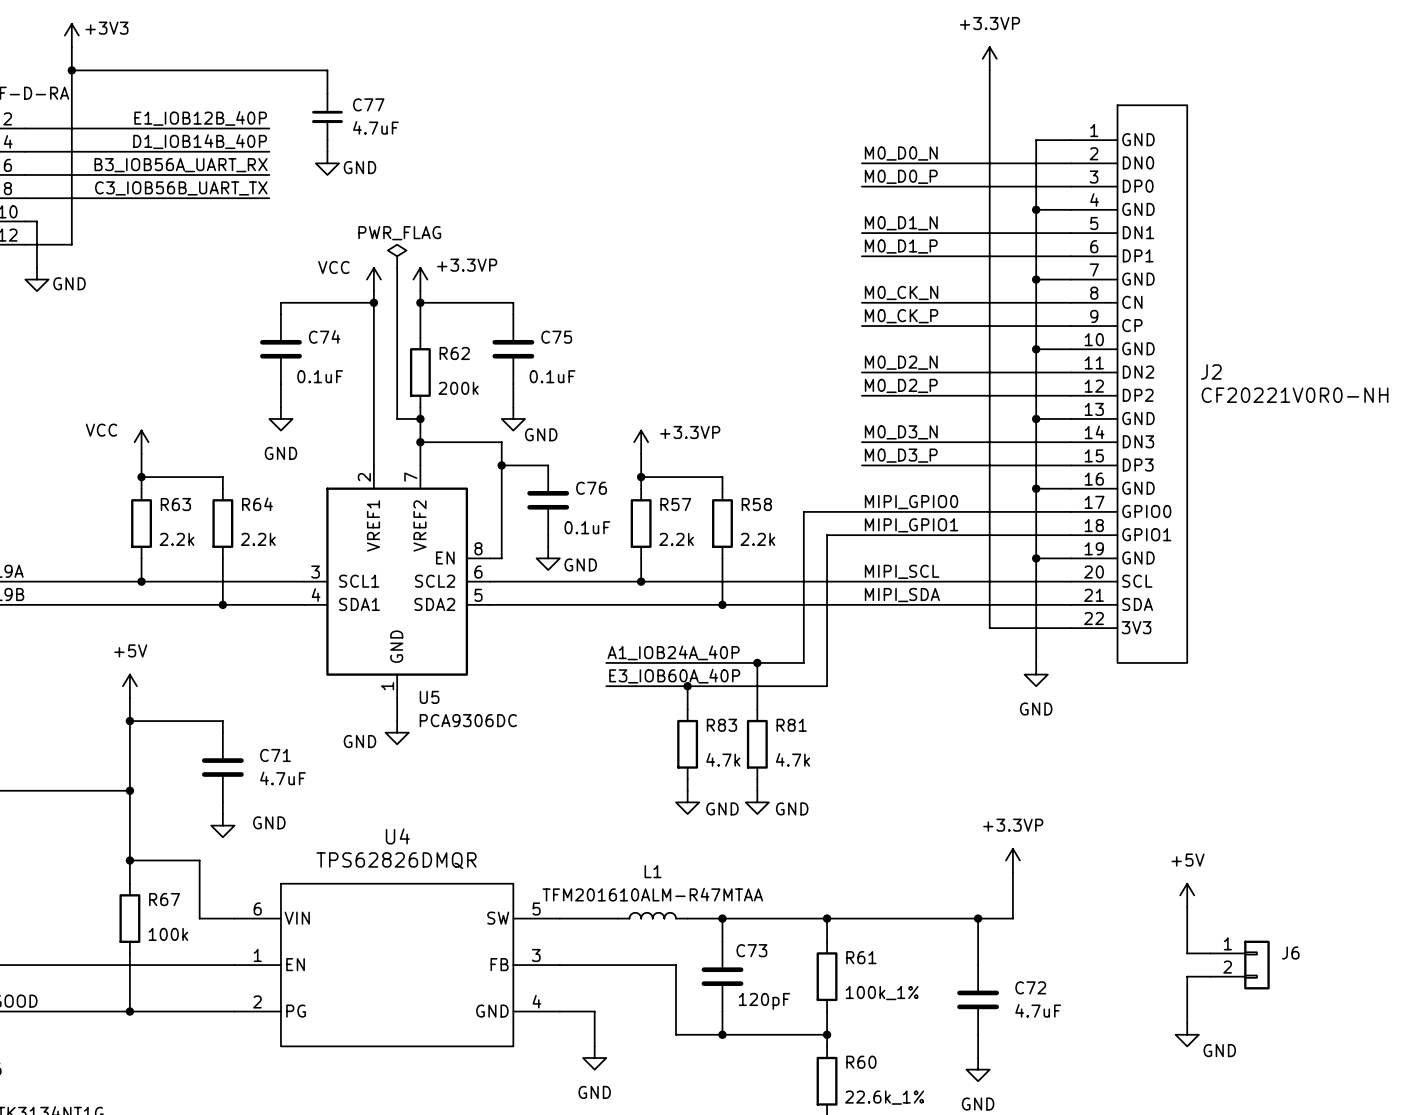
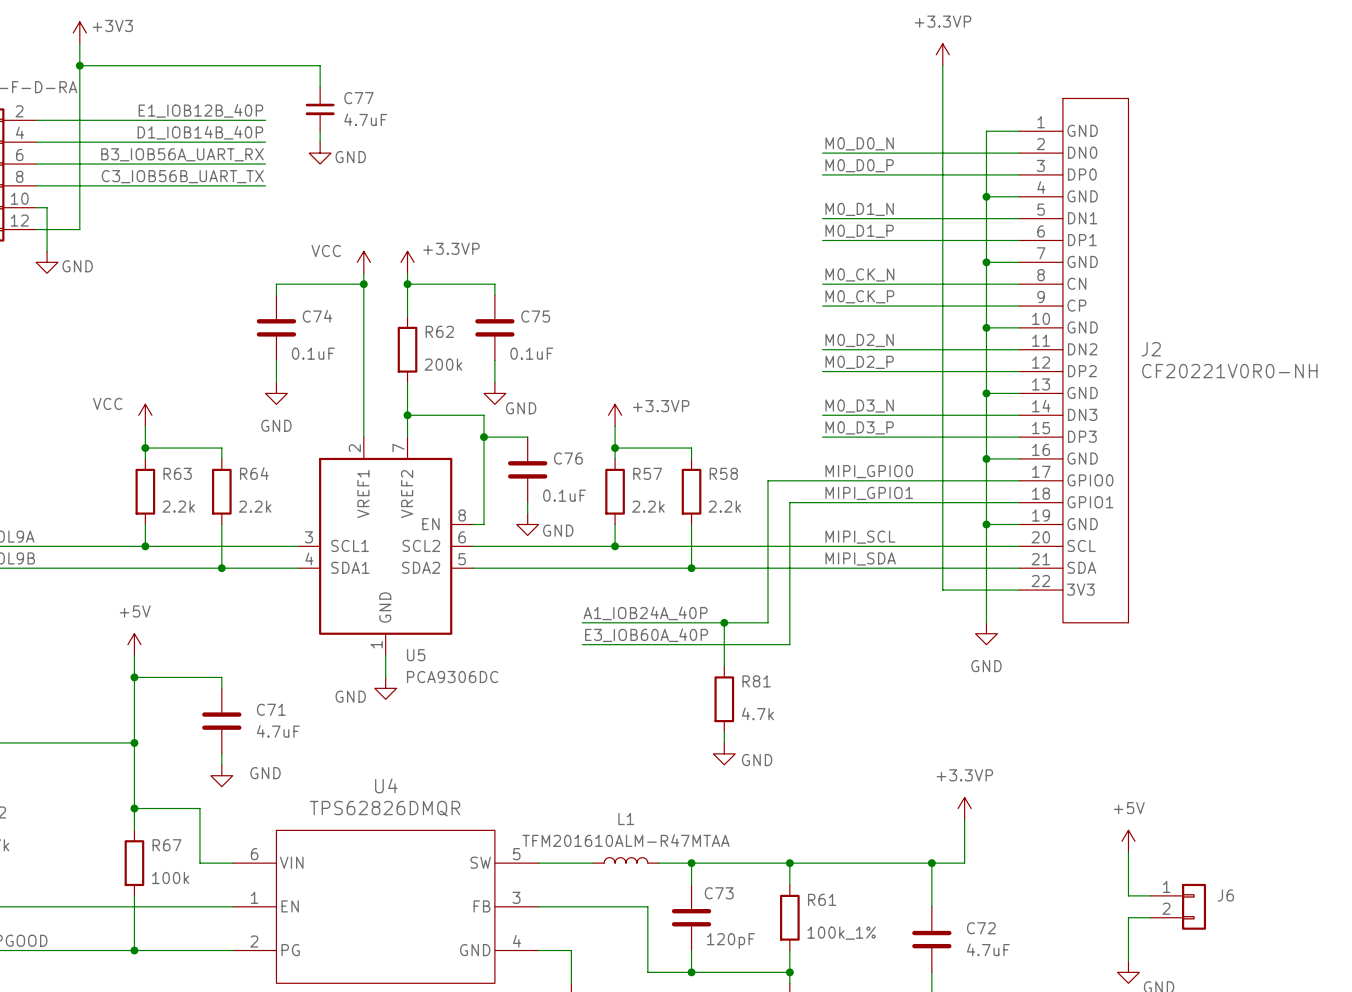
power symbol: PWR_FLAG (397, 256) -> none
wire: (397, 267) (397, 418) (420, 418) -> none
junction: (420, 418) -> none
wire: (687, 686) (687, 709) -> none
junction: (687, 686) -> none
R83: 4.7k (687, 744) -> none
wire: (687, 779) (687, 790) -> none
power symbol: GND (687, 802) -> none

